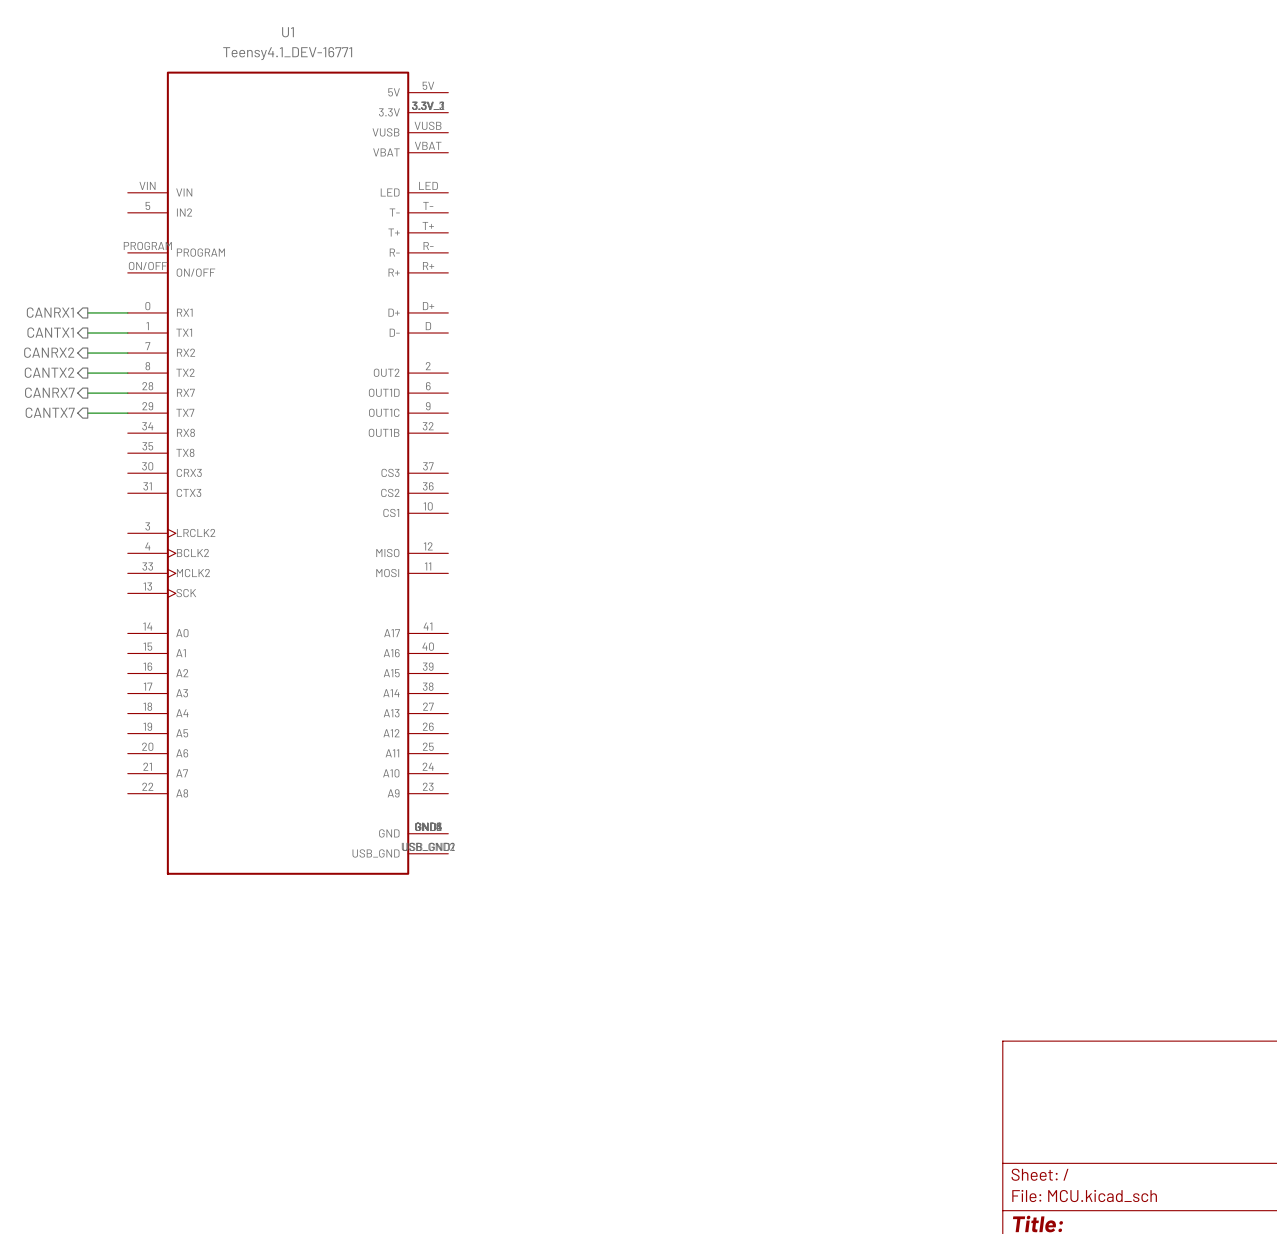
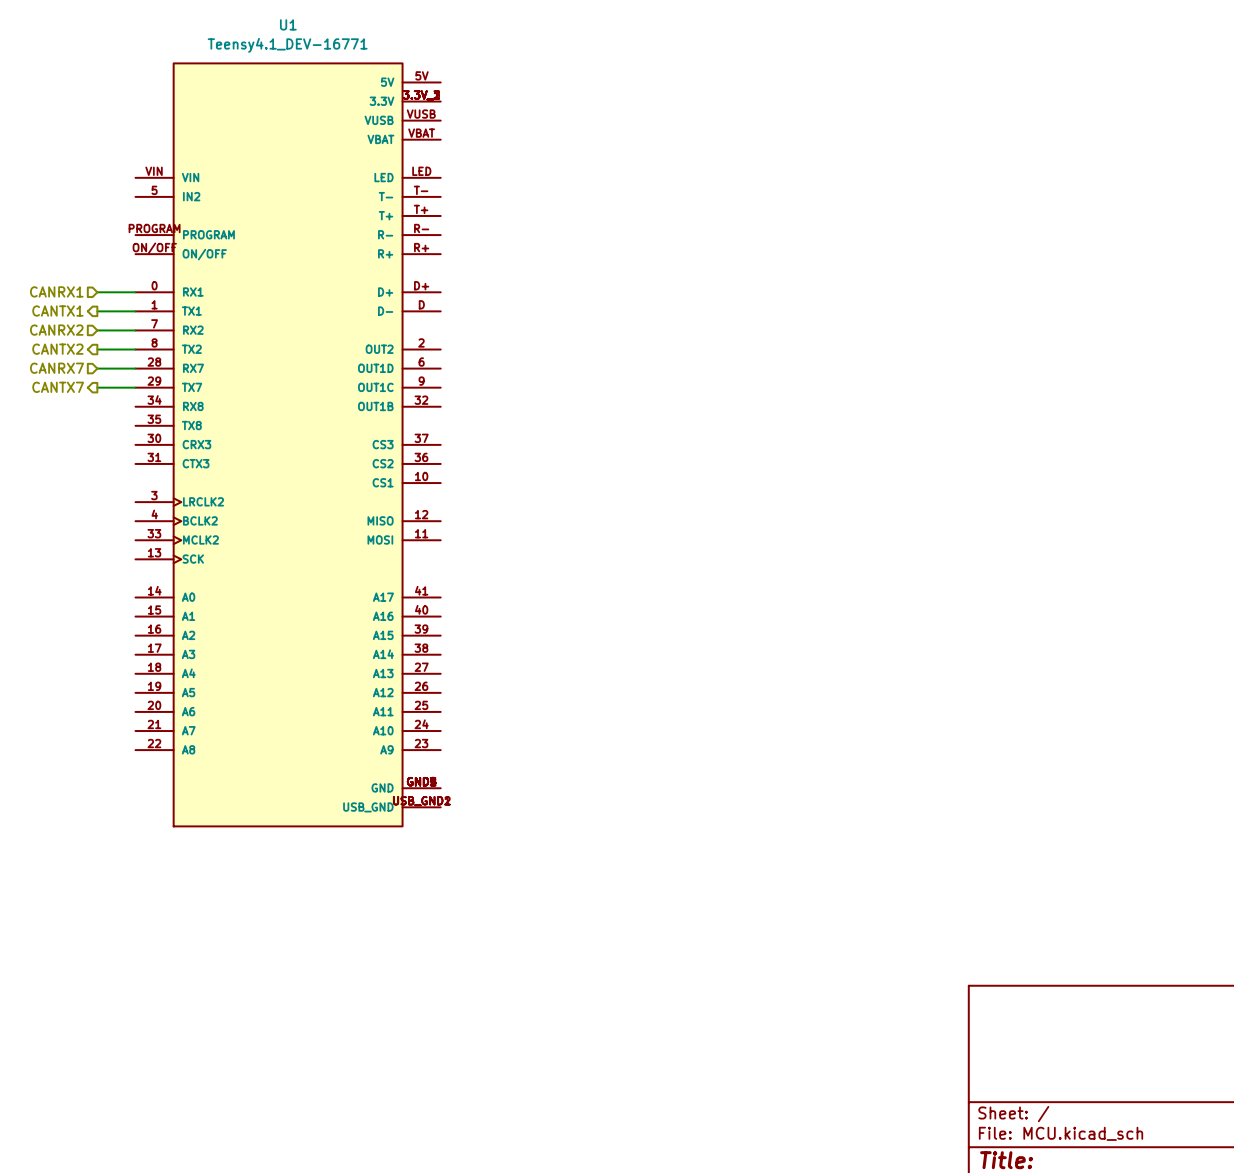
hierarchical label shape: output (50, 312) -> input (56, 291)
hierarchical label shape: output (49, 352) -> input (56, 330)
hierarchical label shape: output (49, 392) -> input (57, 368)

